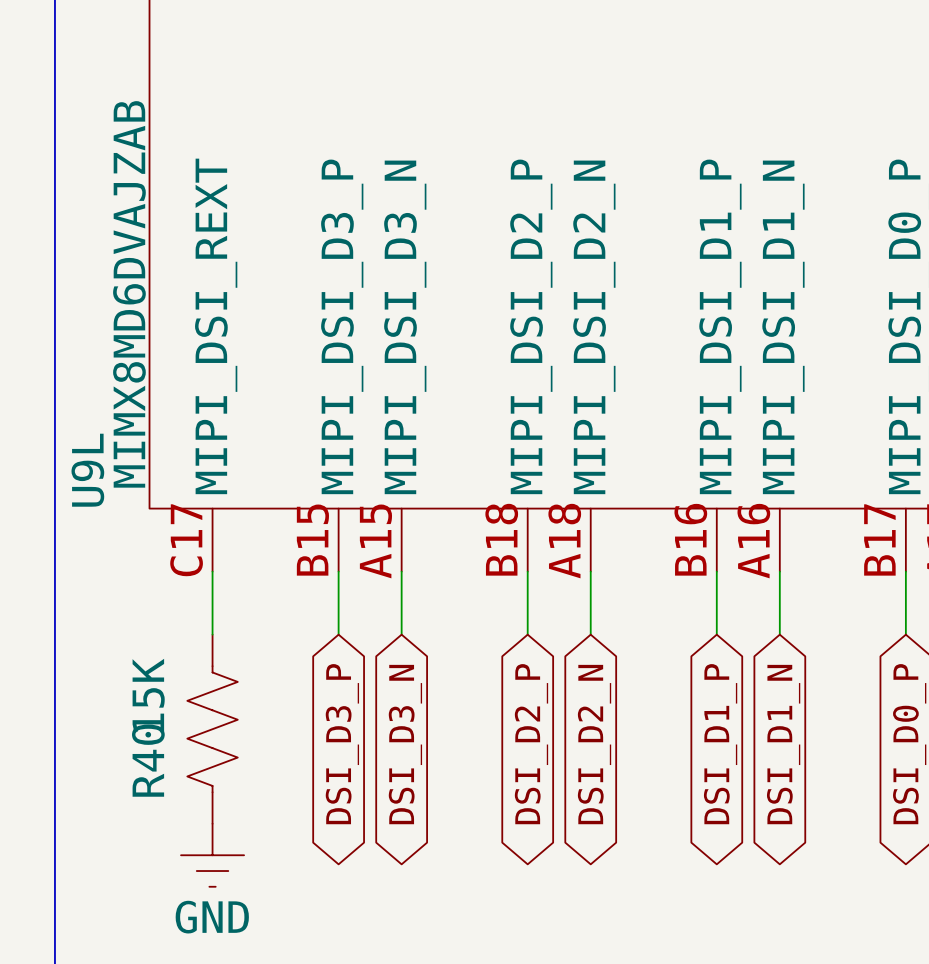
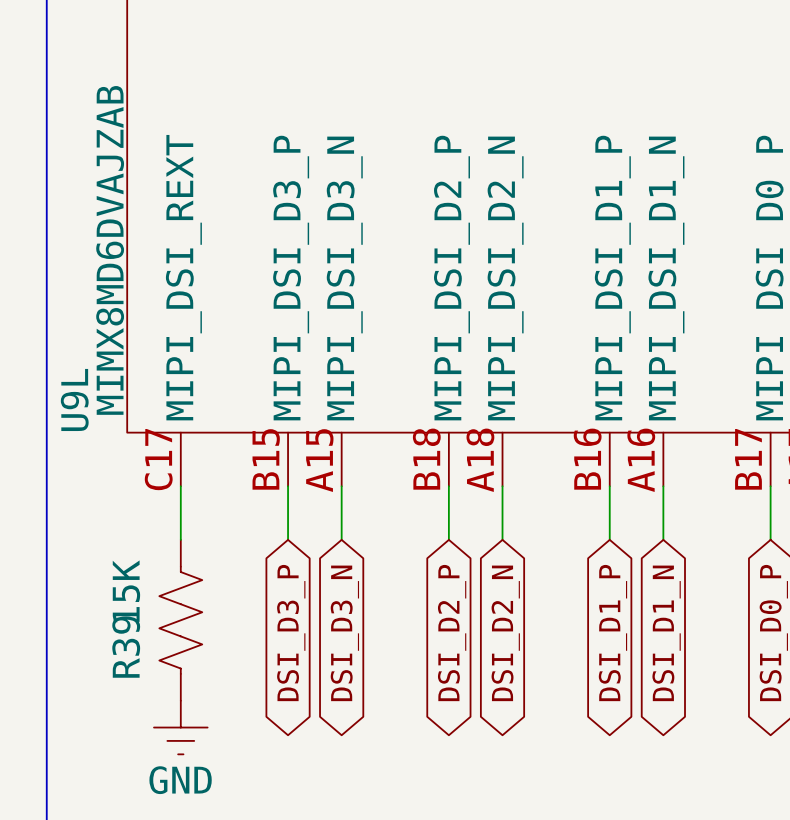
R40 name: R40 (148, 760) -> R39 (126, 647)

